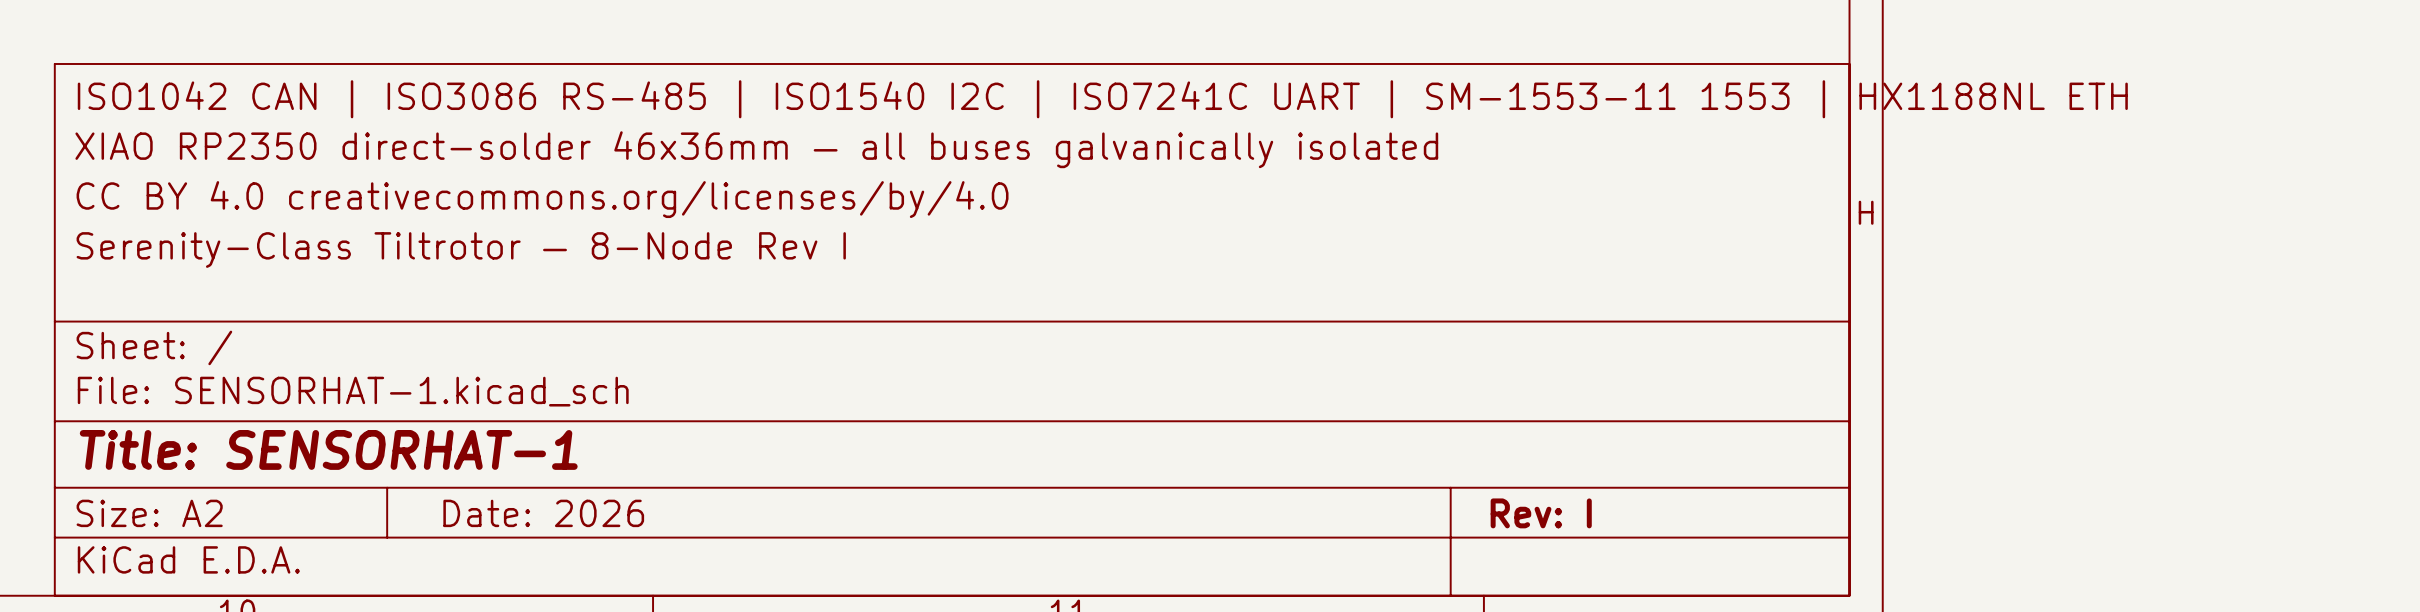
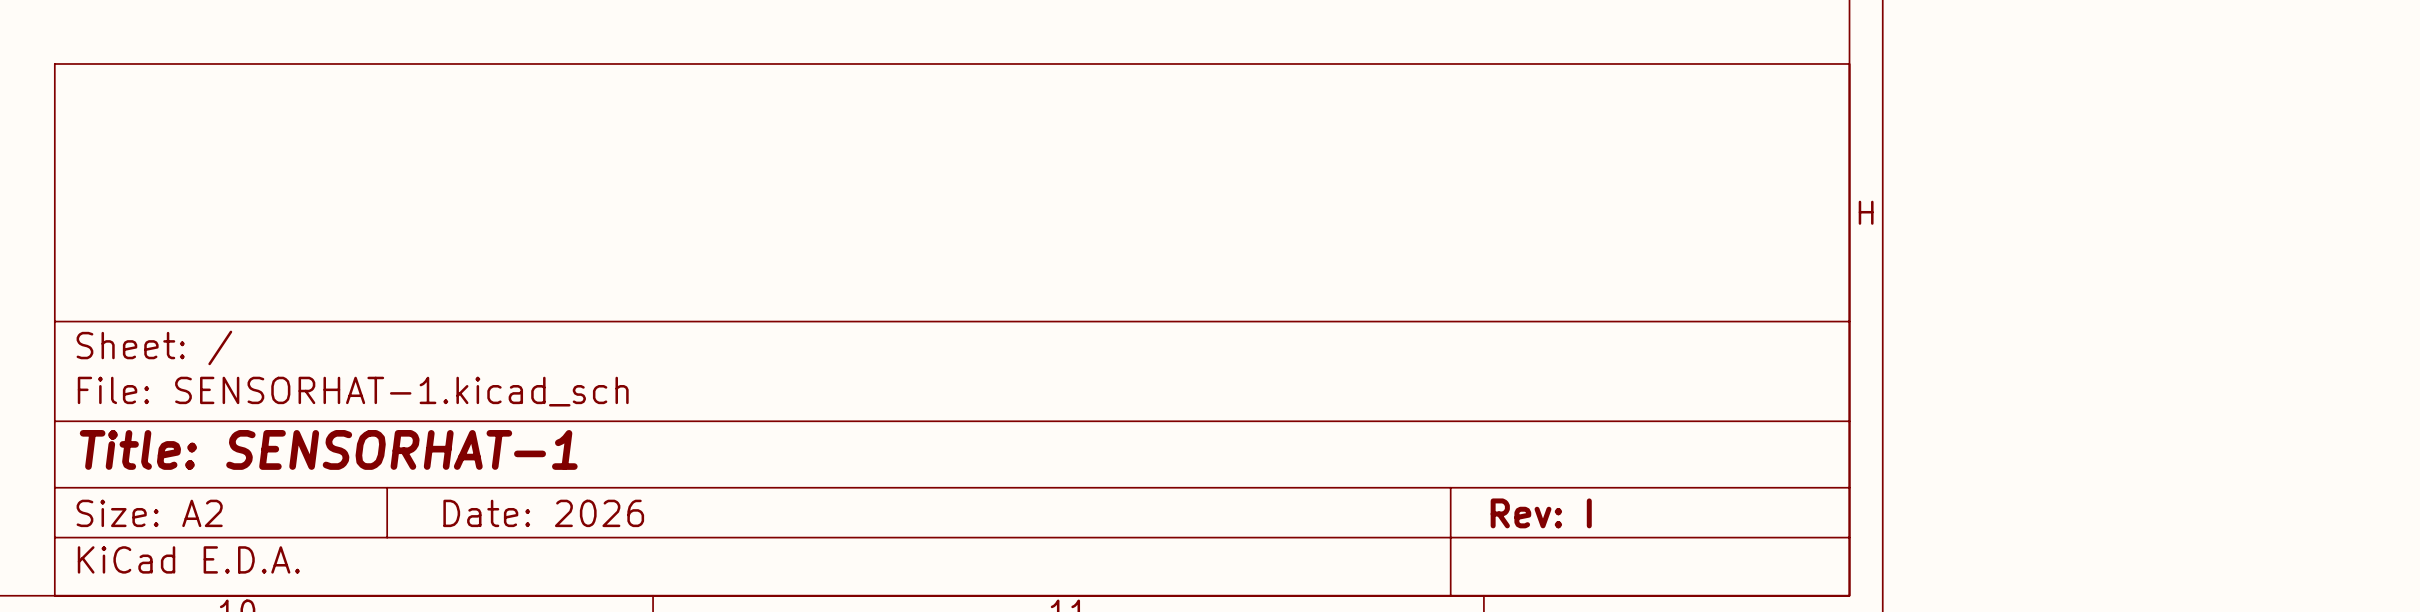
title block: ISO1042 CAN | ISO3086 RS-485 | ISO1540 I2C | ISO7241C UART | SM-1553-11 1553 | HX1188NL ETH (1102, 99) -> none
title block: XIAO RP2350 direct-solder 46x36mm — all buses galvanically isolated (756, 149) -> none
title block: CC BY 4.0 creativecommons.org/licenses/by/4.0 (542, 199) -> none
title block: Serenity-Class Tiltrotor — 8-Node Rev I (461, 250) -> none

